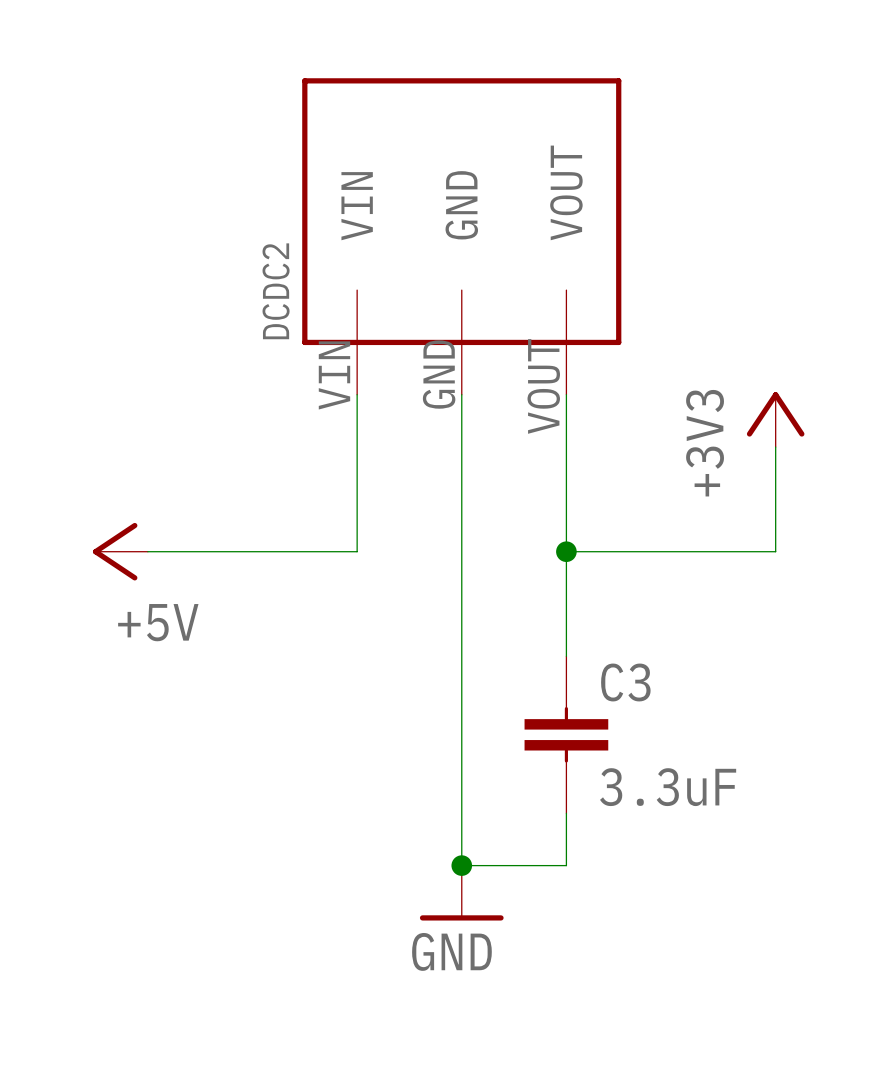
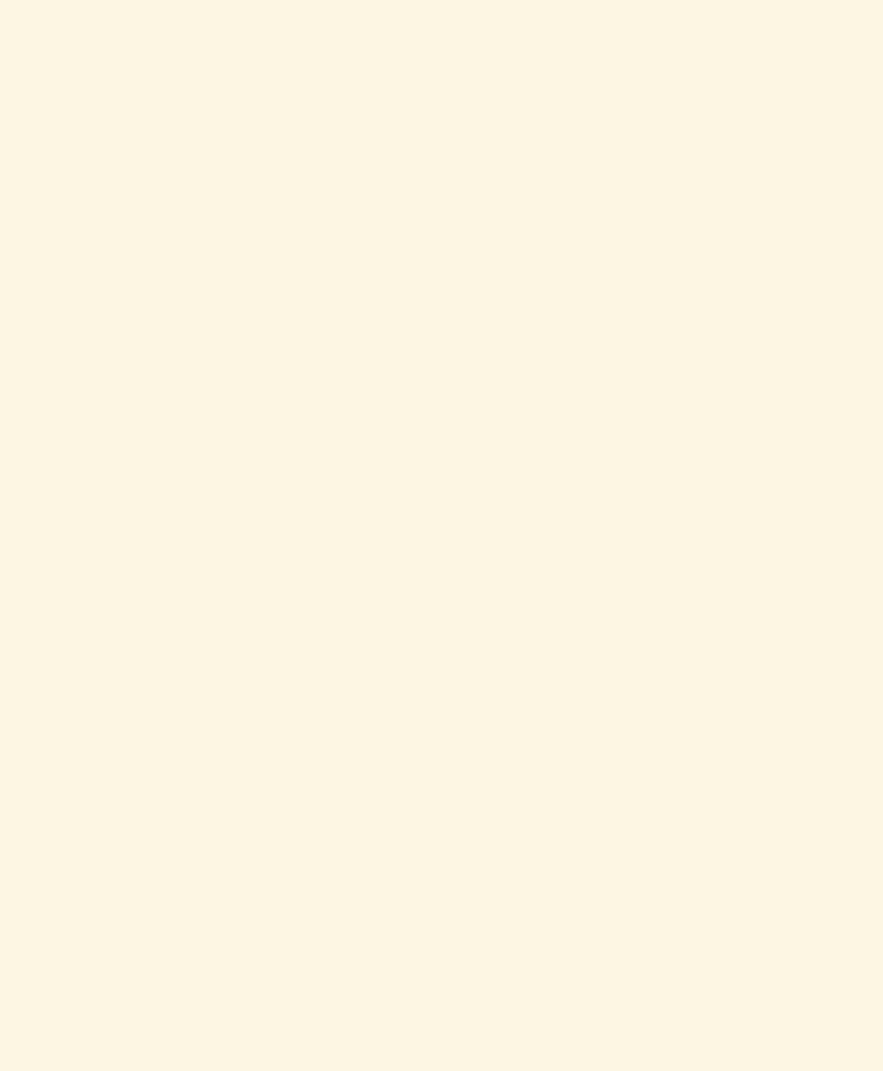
DCDC2: (461, 236) -> none
wire: (357, 394) (357, 551) (147, 551) -> none
wire: (461, 394) (461, 865) (566, 865) (566, 813) -> none
wire: (566, 394) (566, 656) -> none
power symbol: +3V3 (775, 419) -> none
wire: (775, 447) (775, 551) (566, 551) -> none
power symbol: +5V (120, 551) -> none
junction: (566, 551) -> none
C3: 3.3uF (566, 734) -> none
junction: (461, 865) -> none
power symbol: GND (461, 893) -> none

